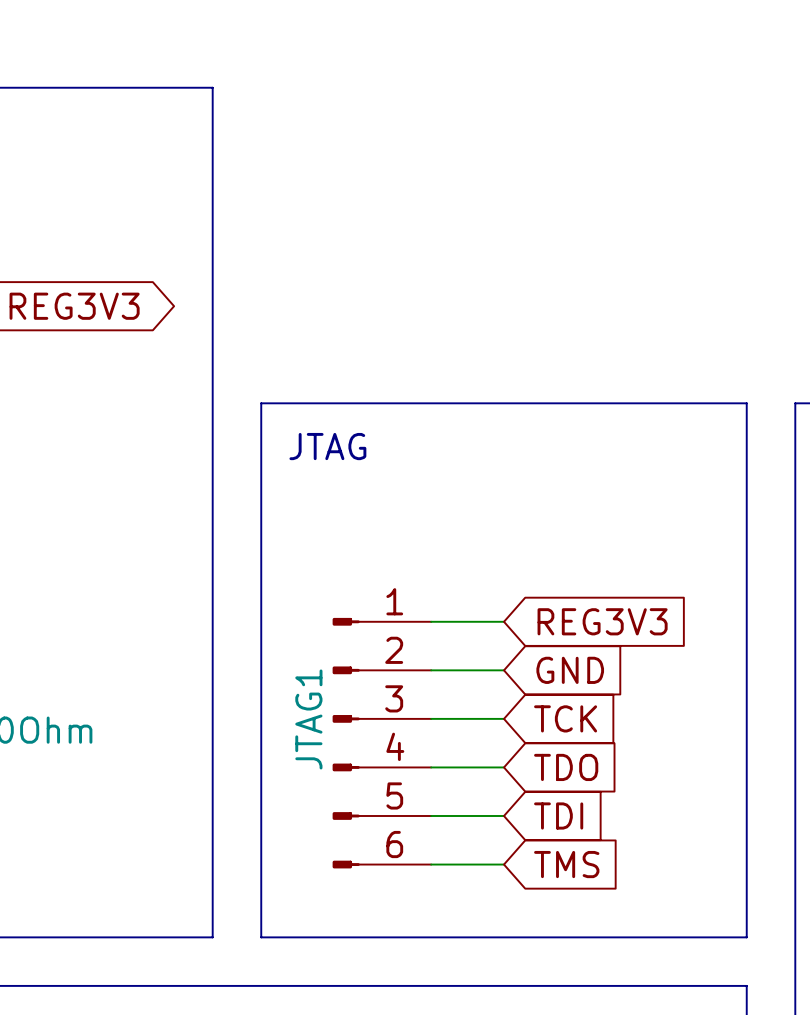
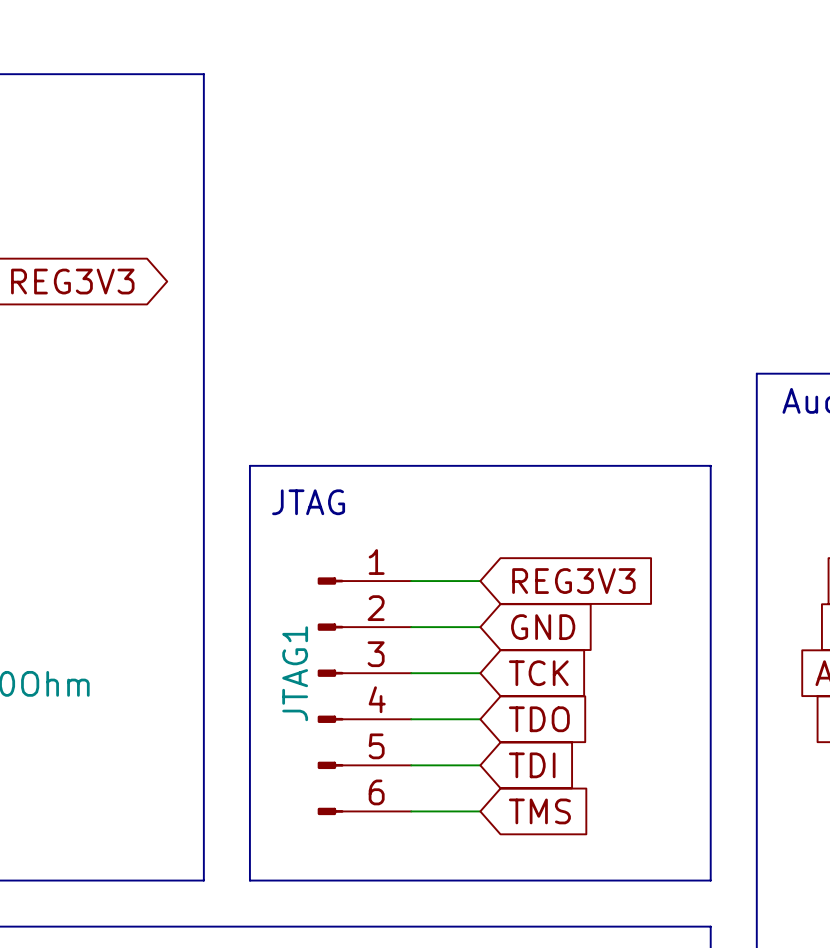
text position: JTAG (327, 446) -> JTAG (308, 502)
line: (261, 500) (261, 403) (746, 403) (746, 500) -> (249, 465) (710, 465)

